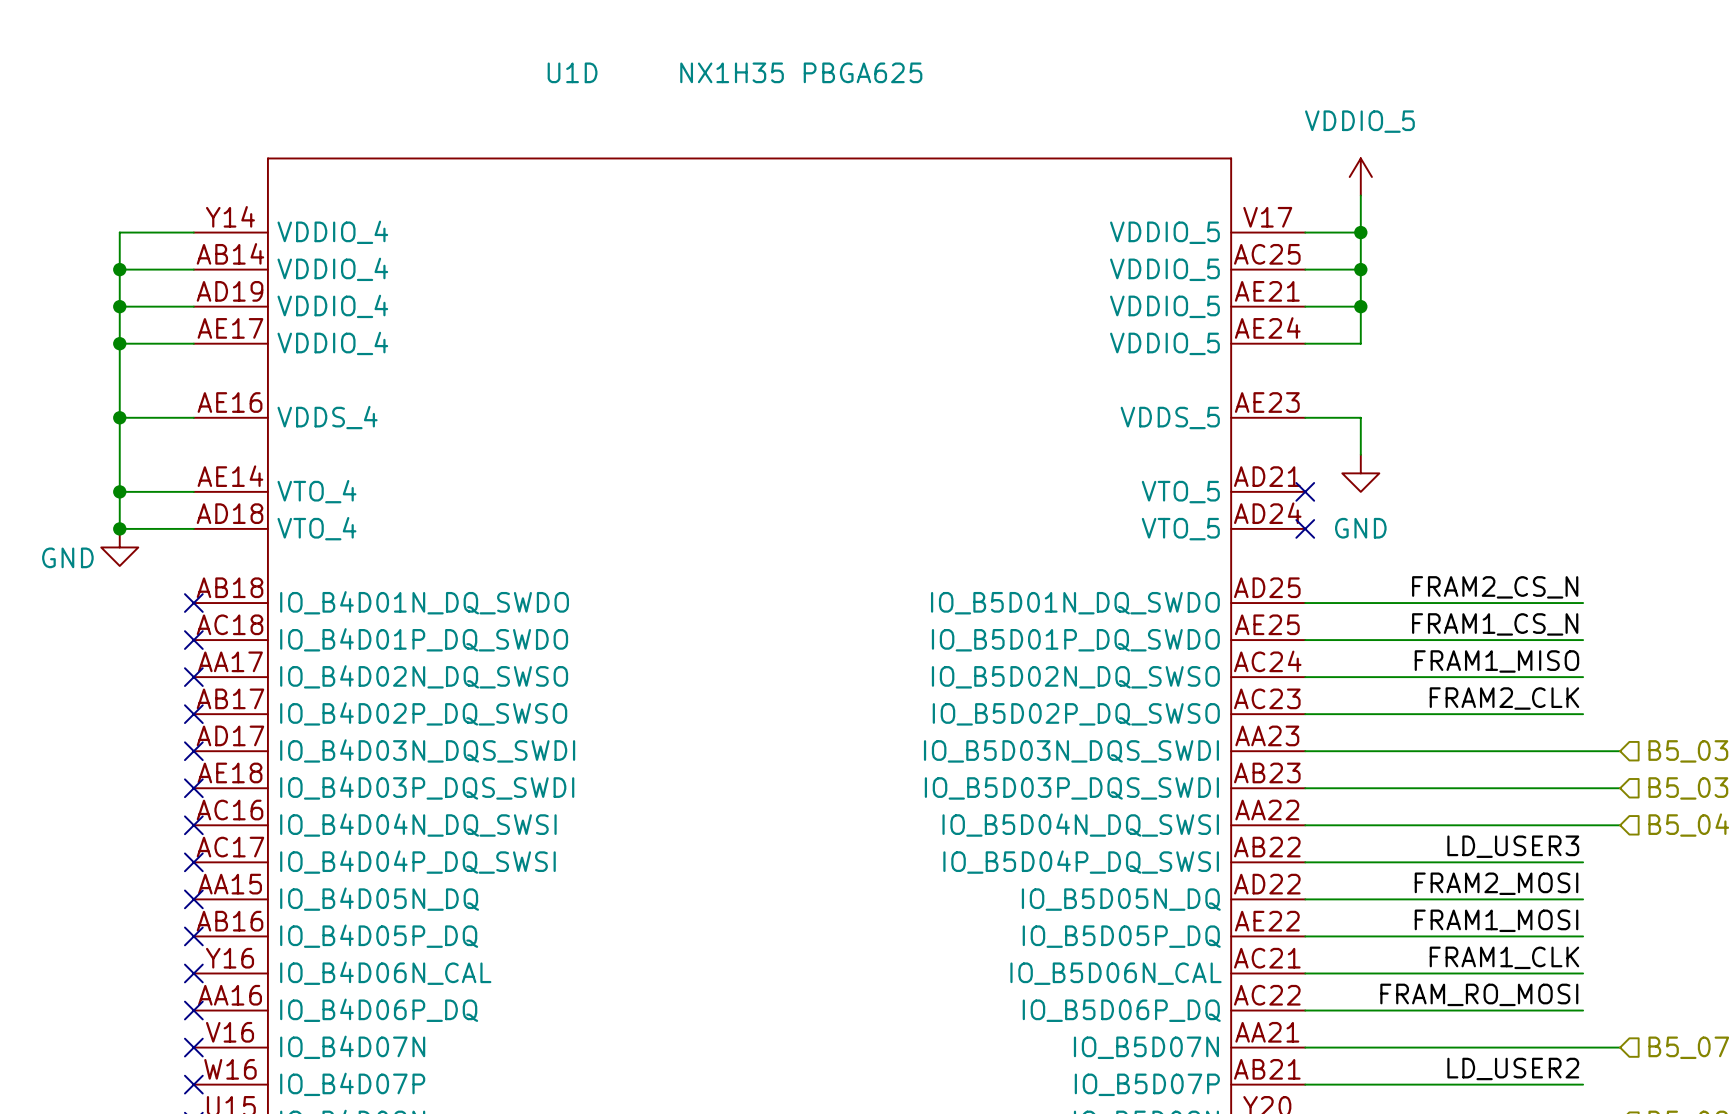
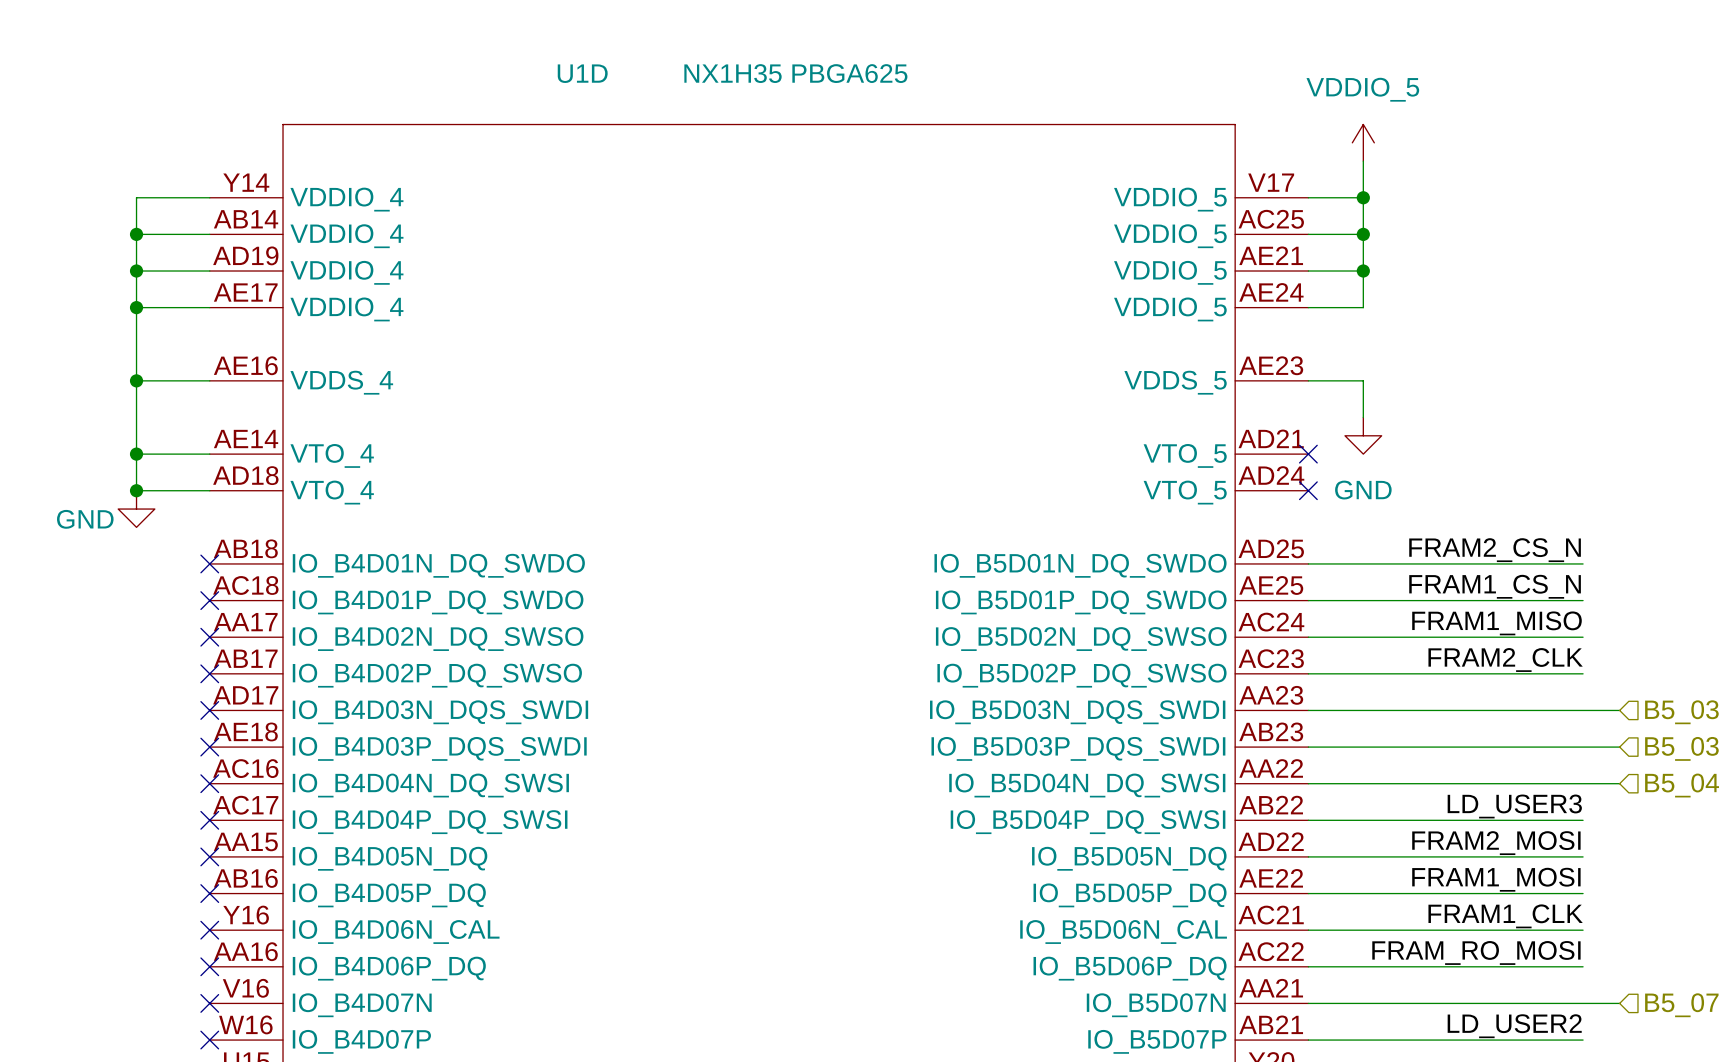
U1D name position: U1D (572, 72) -> U1D (582, 73)
U1D value position: NX1H35 PBGA625 (801, 72) -> NX1H35 PBGA625 (795, 73)

